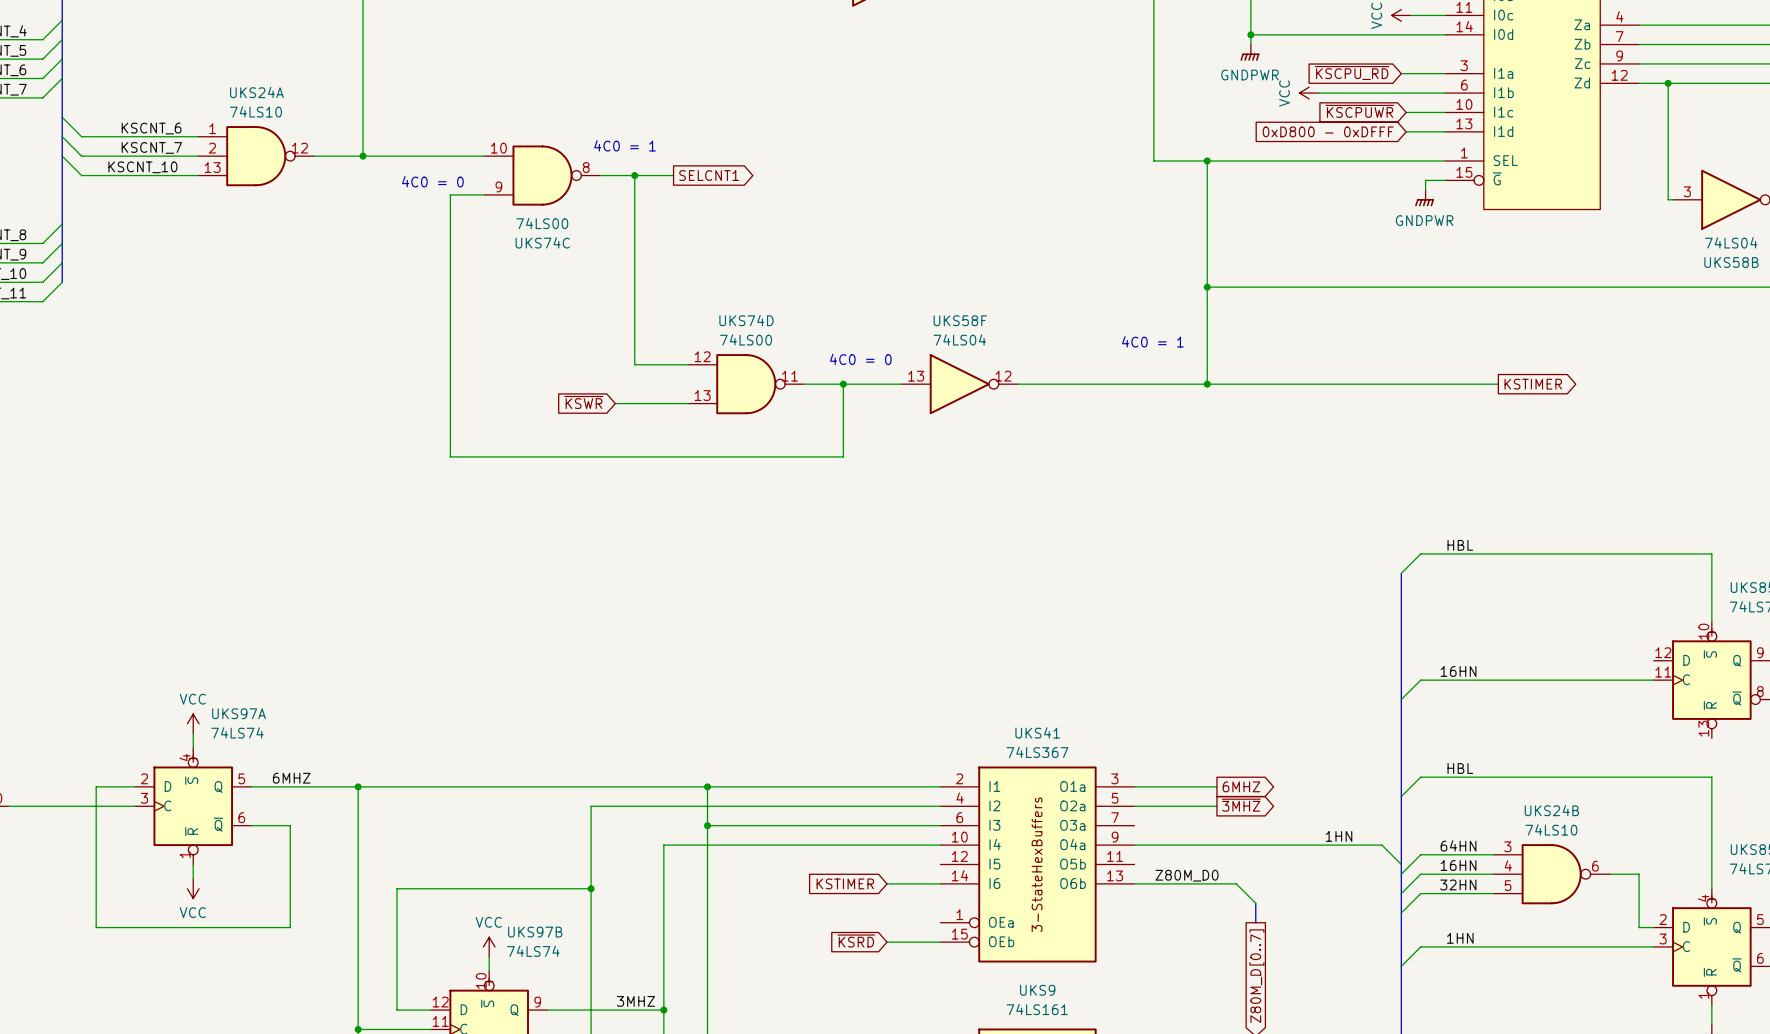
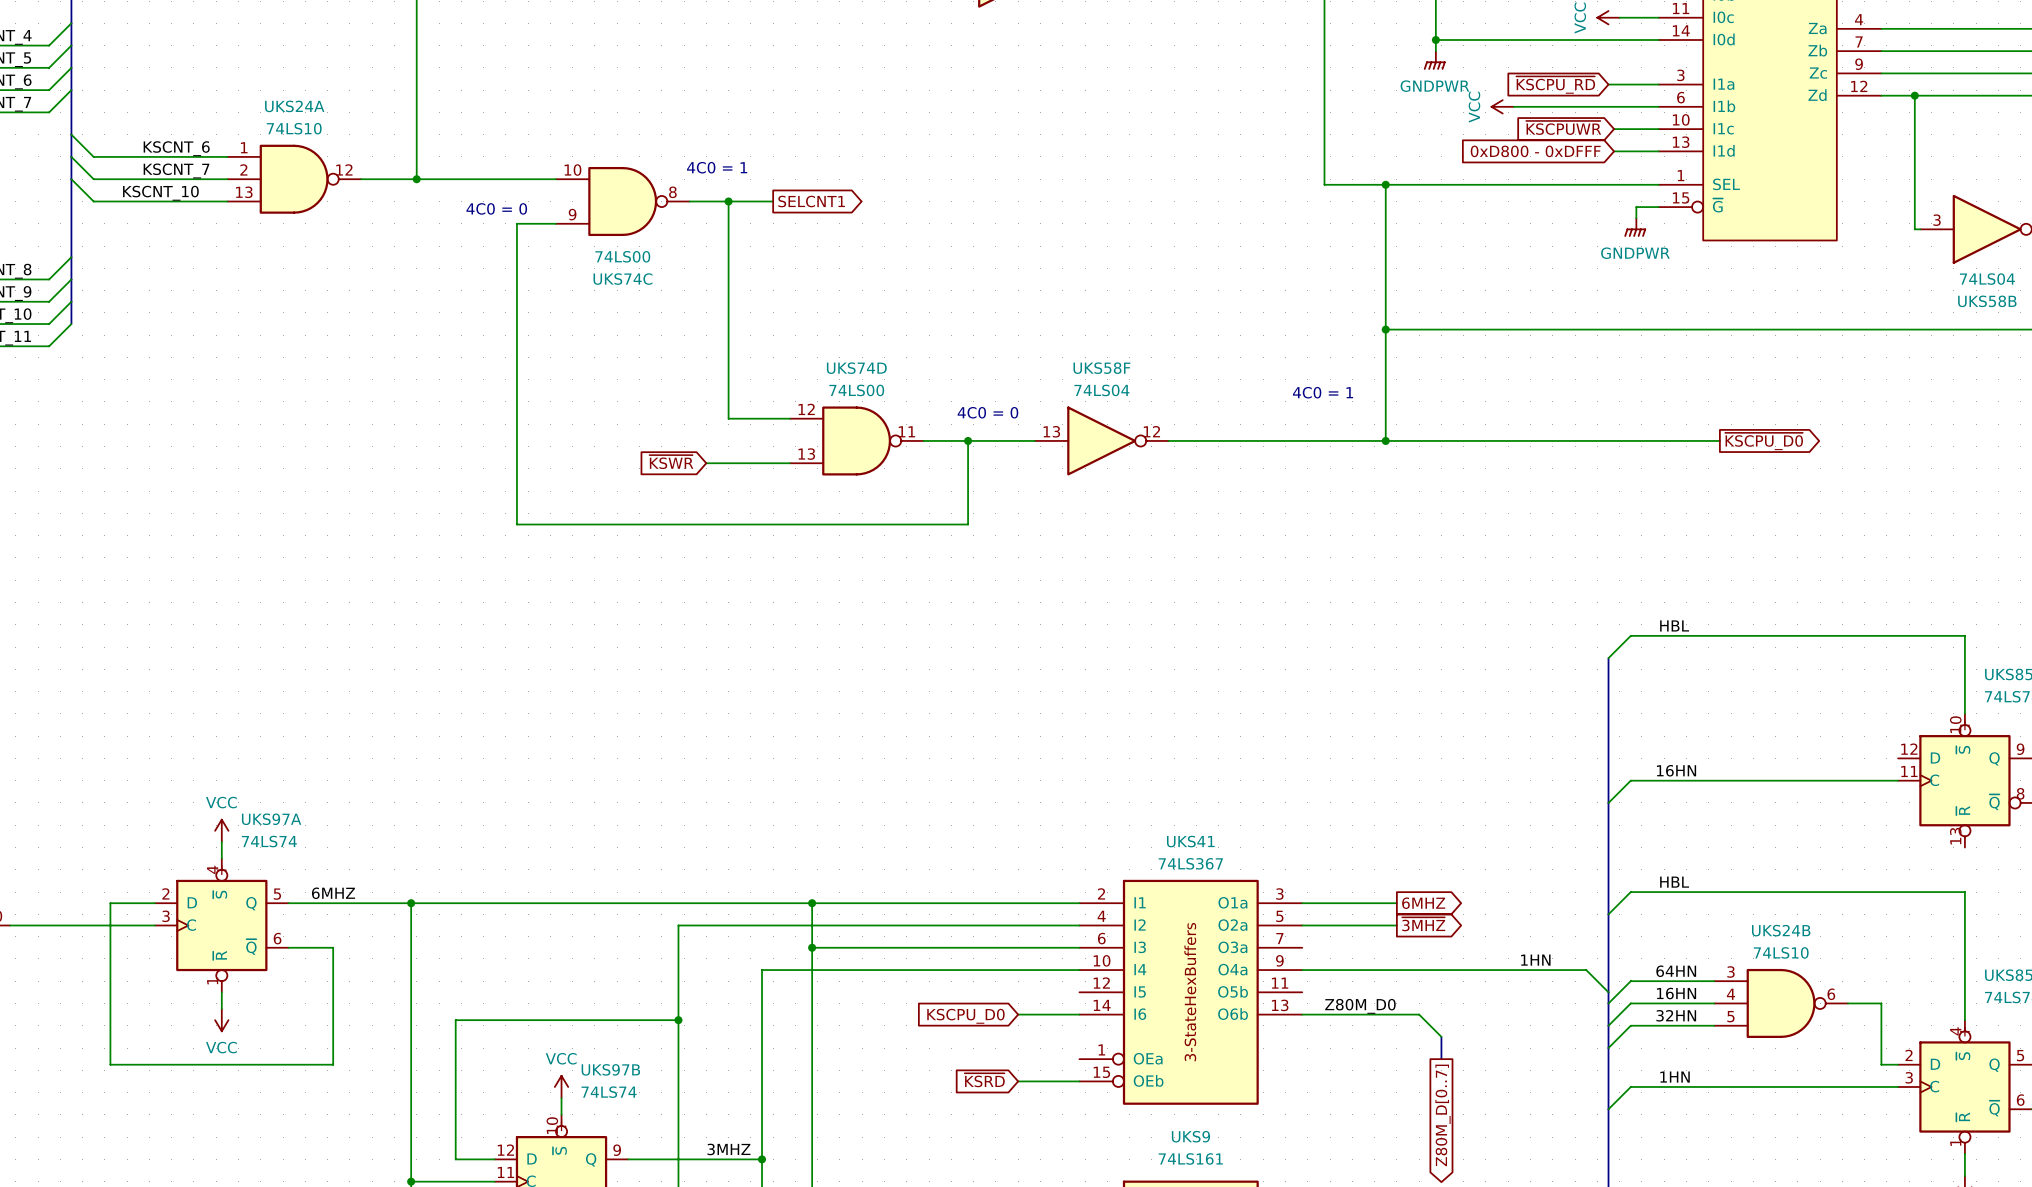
global label: KSTIMER (1533, 384) -> ~{KSCPU_D0} (1764, 441)
global label: KSTIMER (845, 883) -> KSCPU_D0 (965, 1016)

